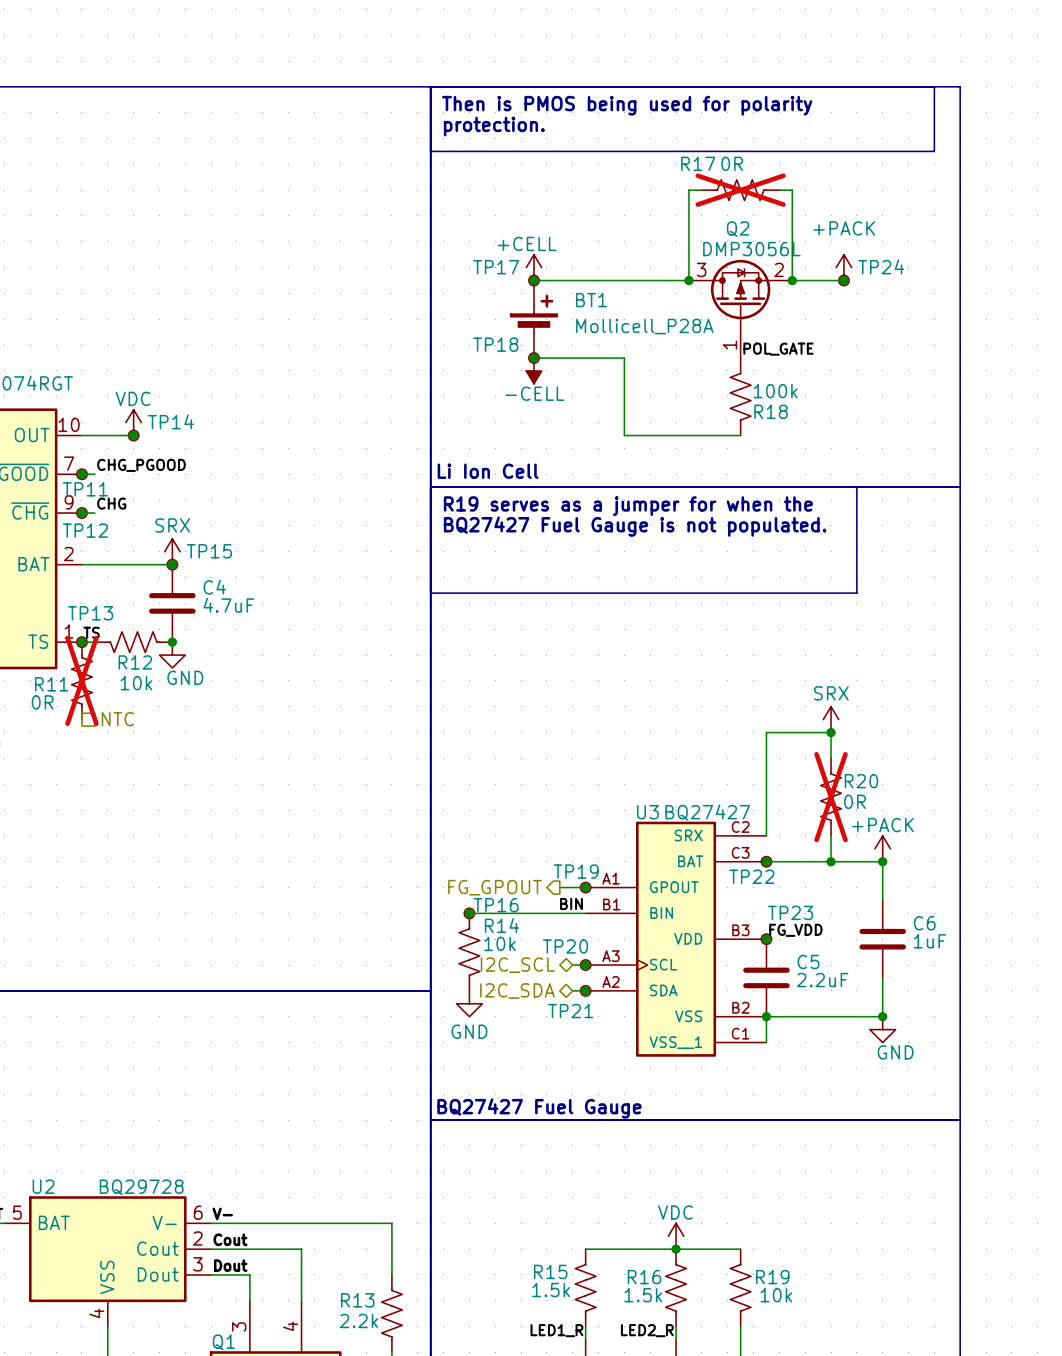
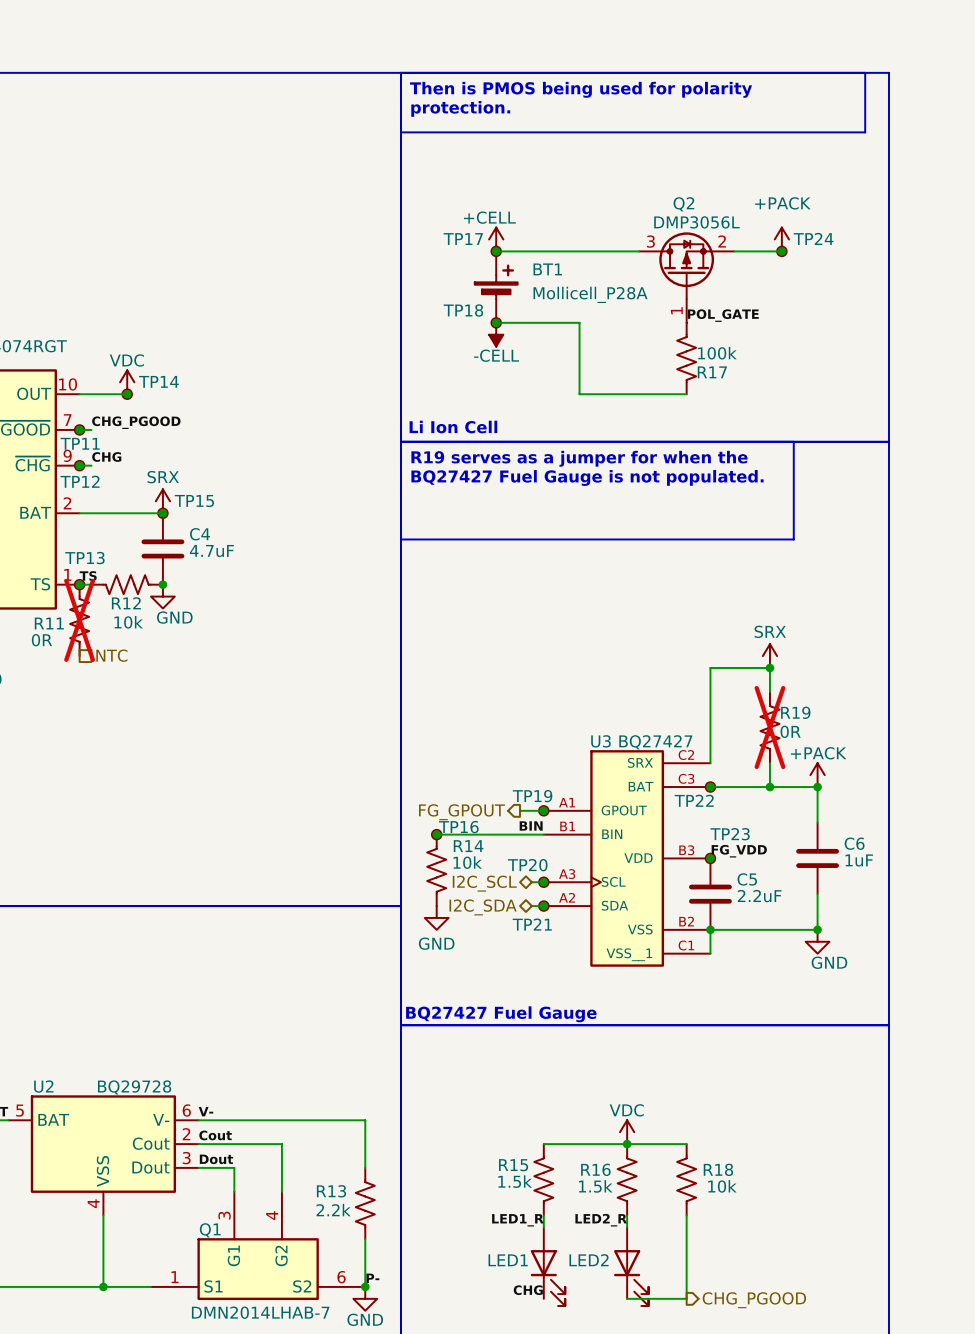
wire: (701, 190) (688, 190) (688, 280) -> none
R17: 0R (740, 190) -> none
wire: (779, 190) (792, 190) (792, 280) -> none
junction: (688, 280) -> none
junction: (792, 280) -> none
R18 name: R18 (771, 411) -> R17 (712, 372)
R20 name: R20 (861, 781) -> R19 (795, 712)
R19 name: R19 (772, 1277) -> R18 (718, 1169)

